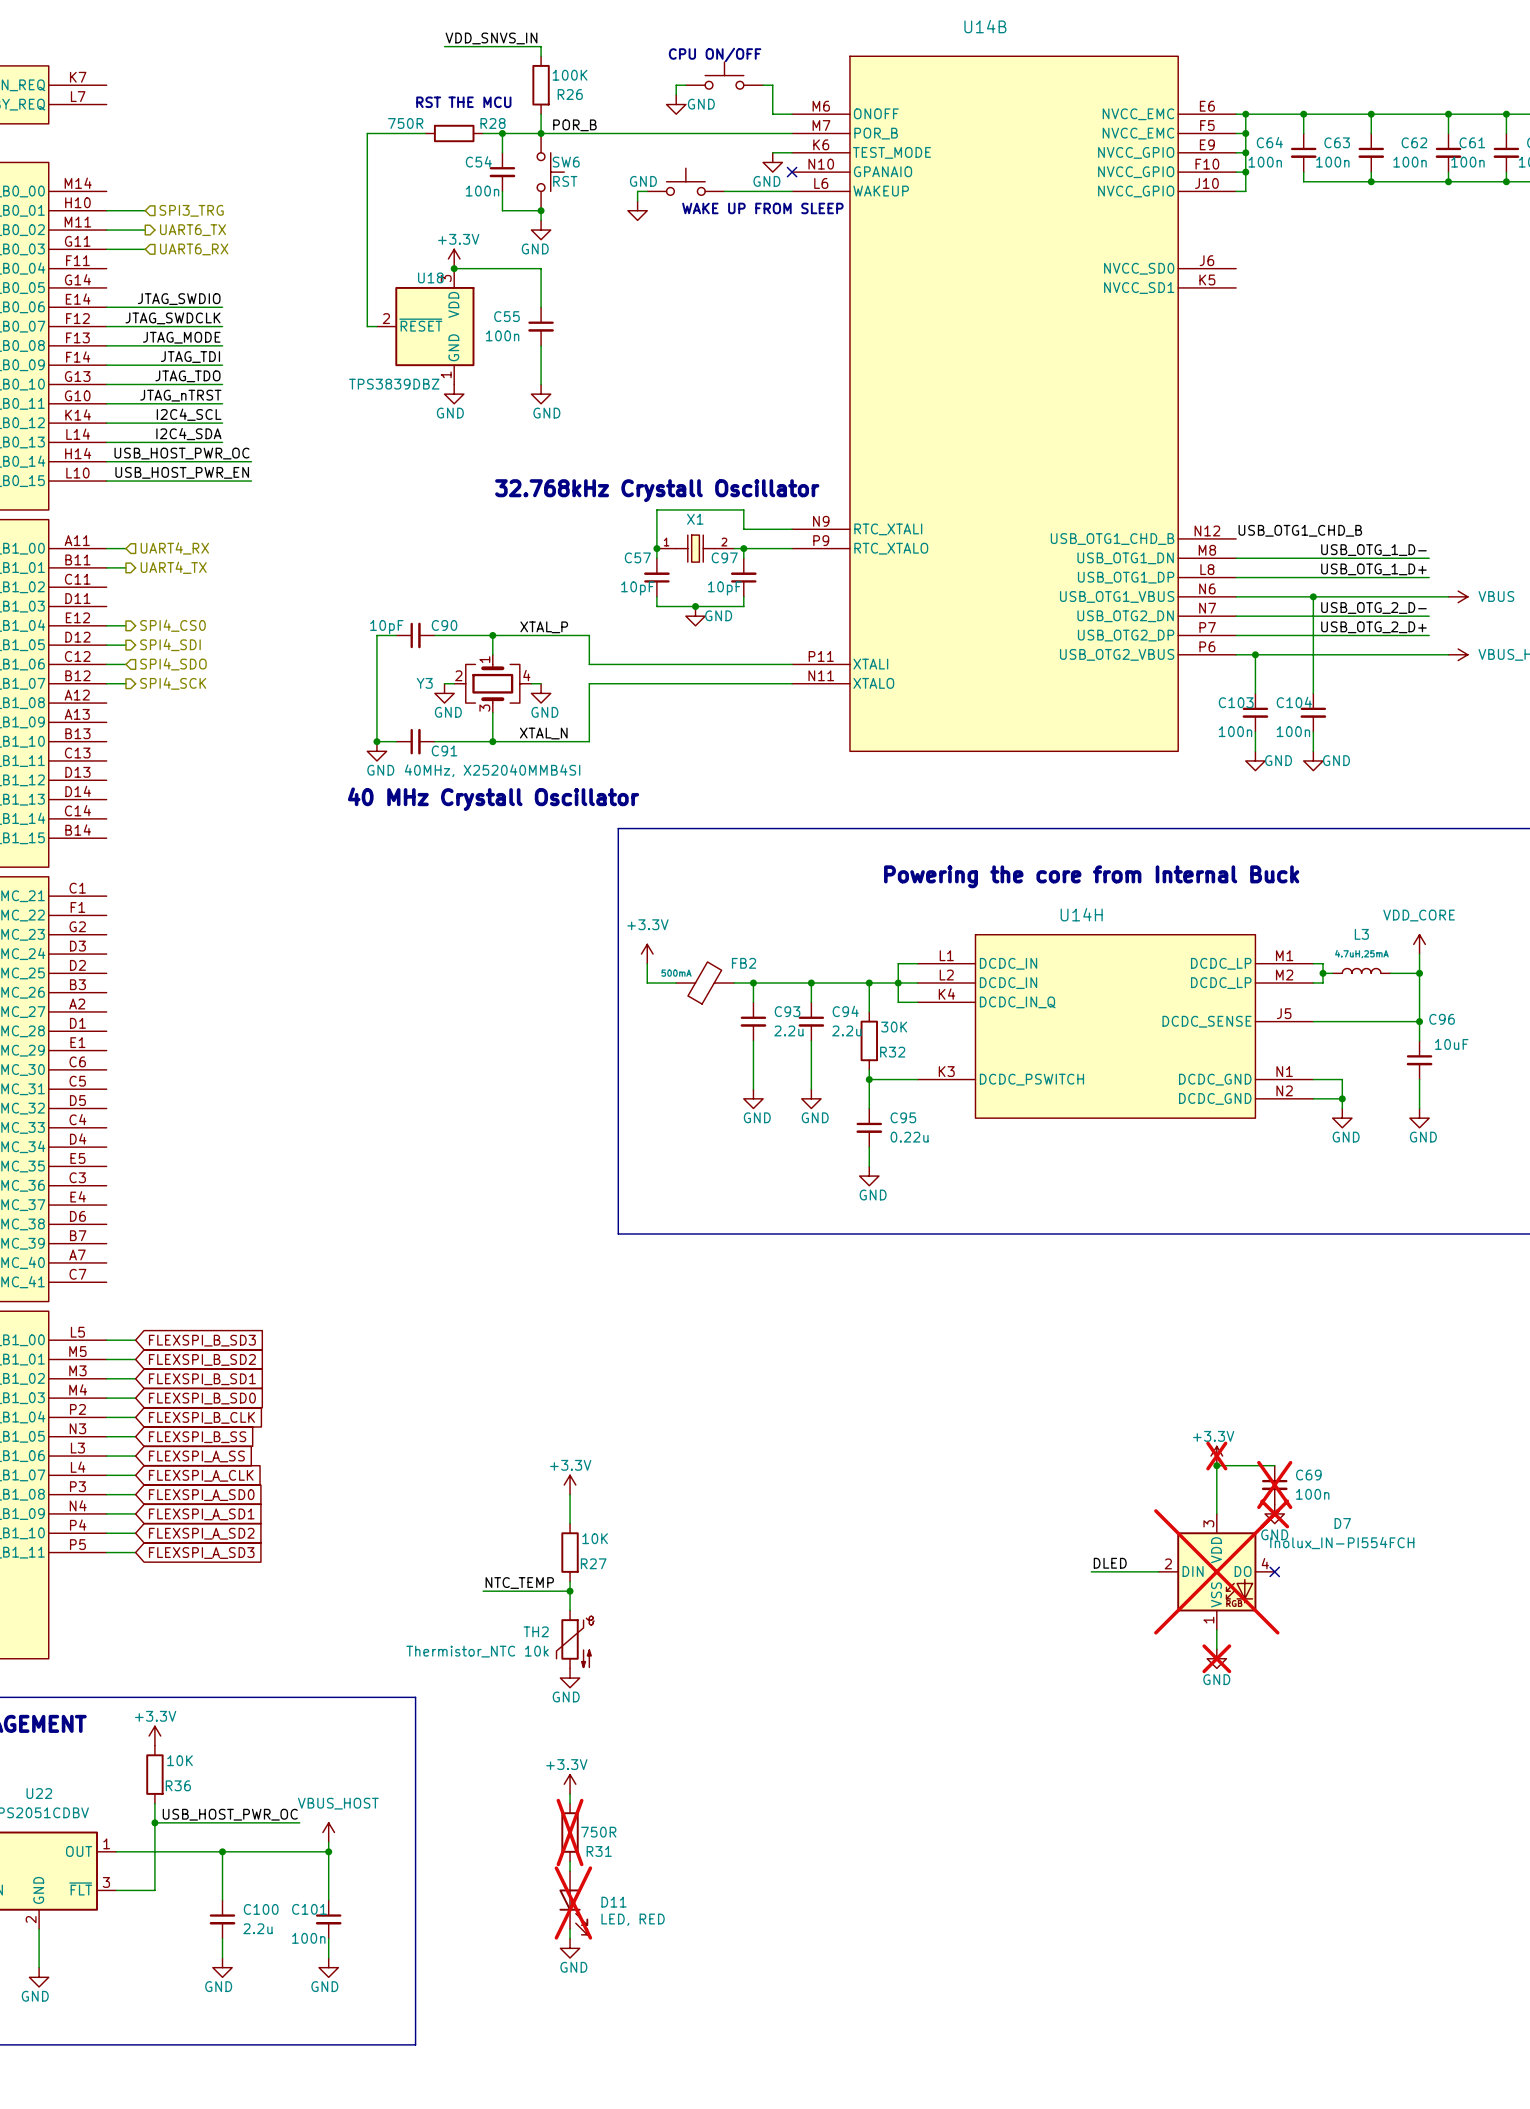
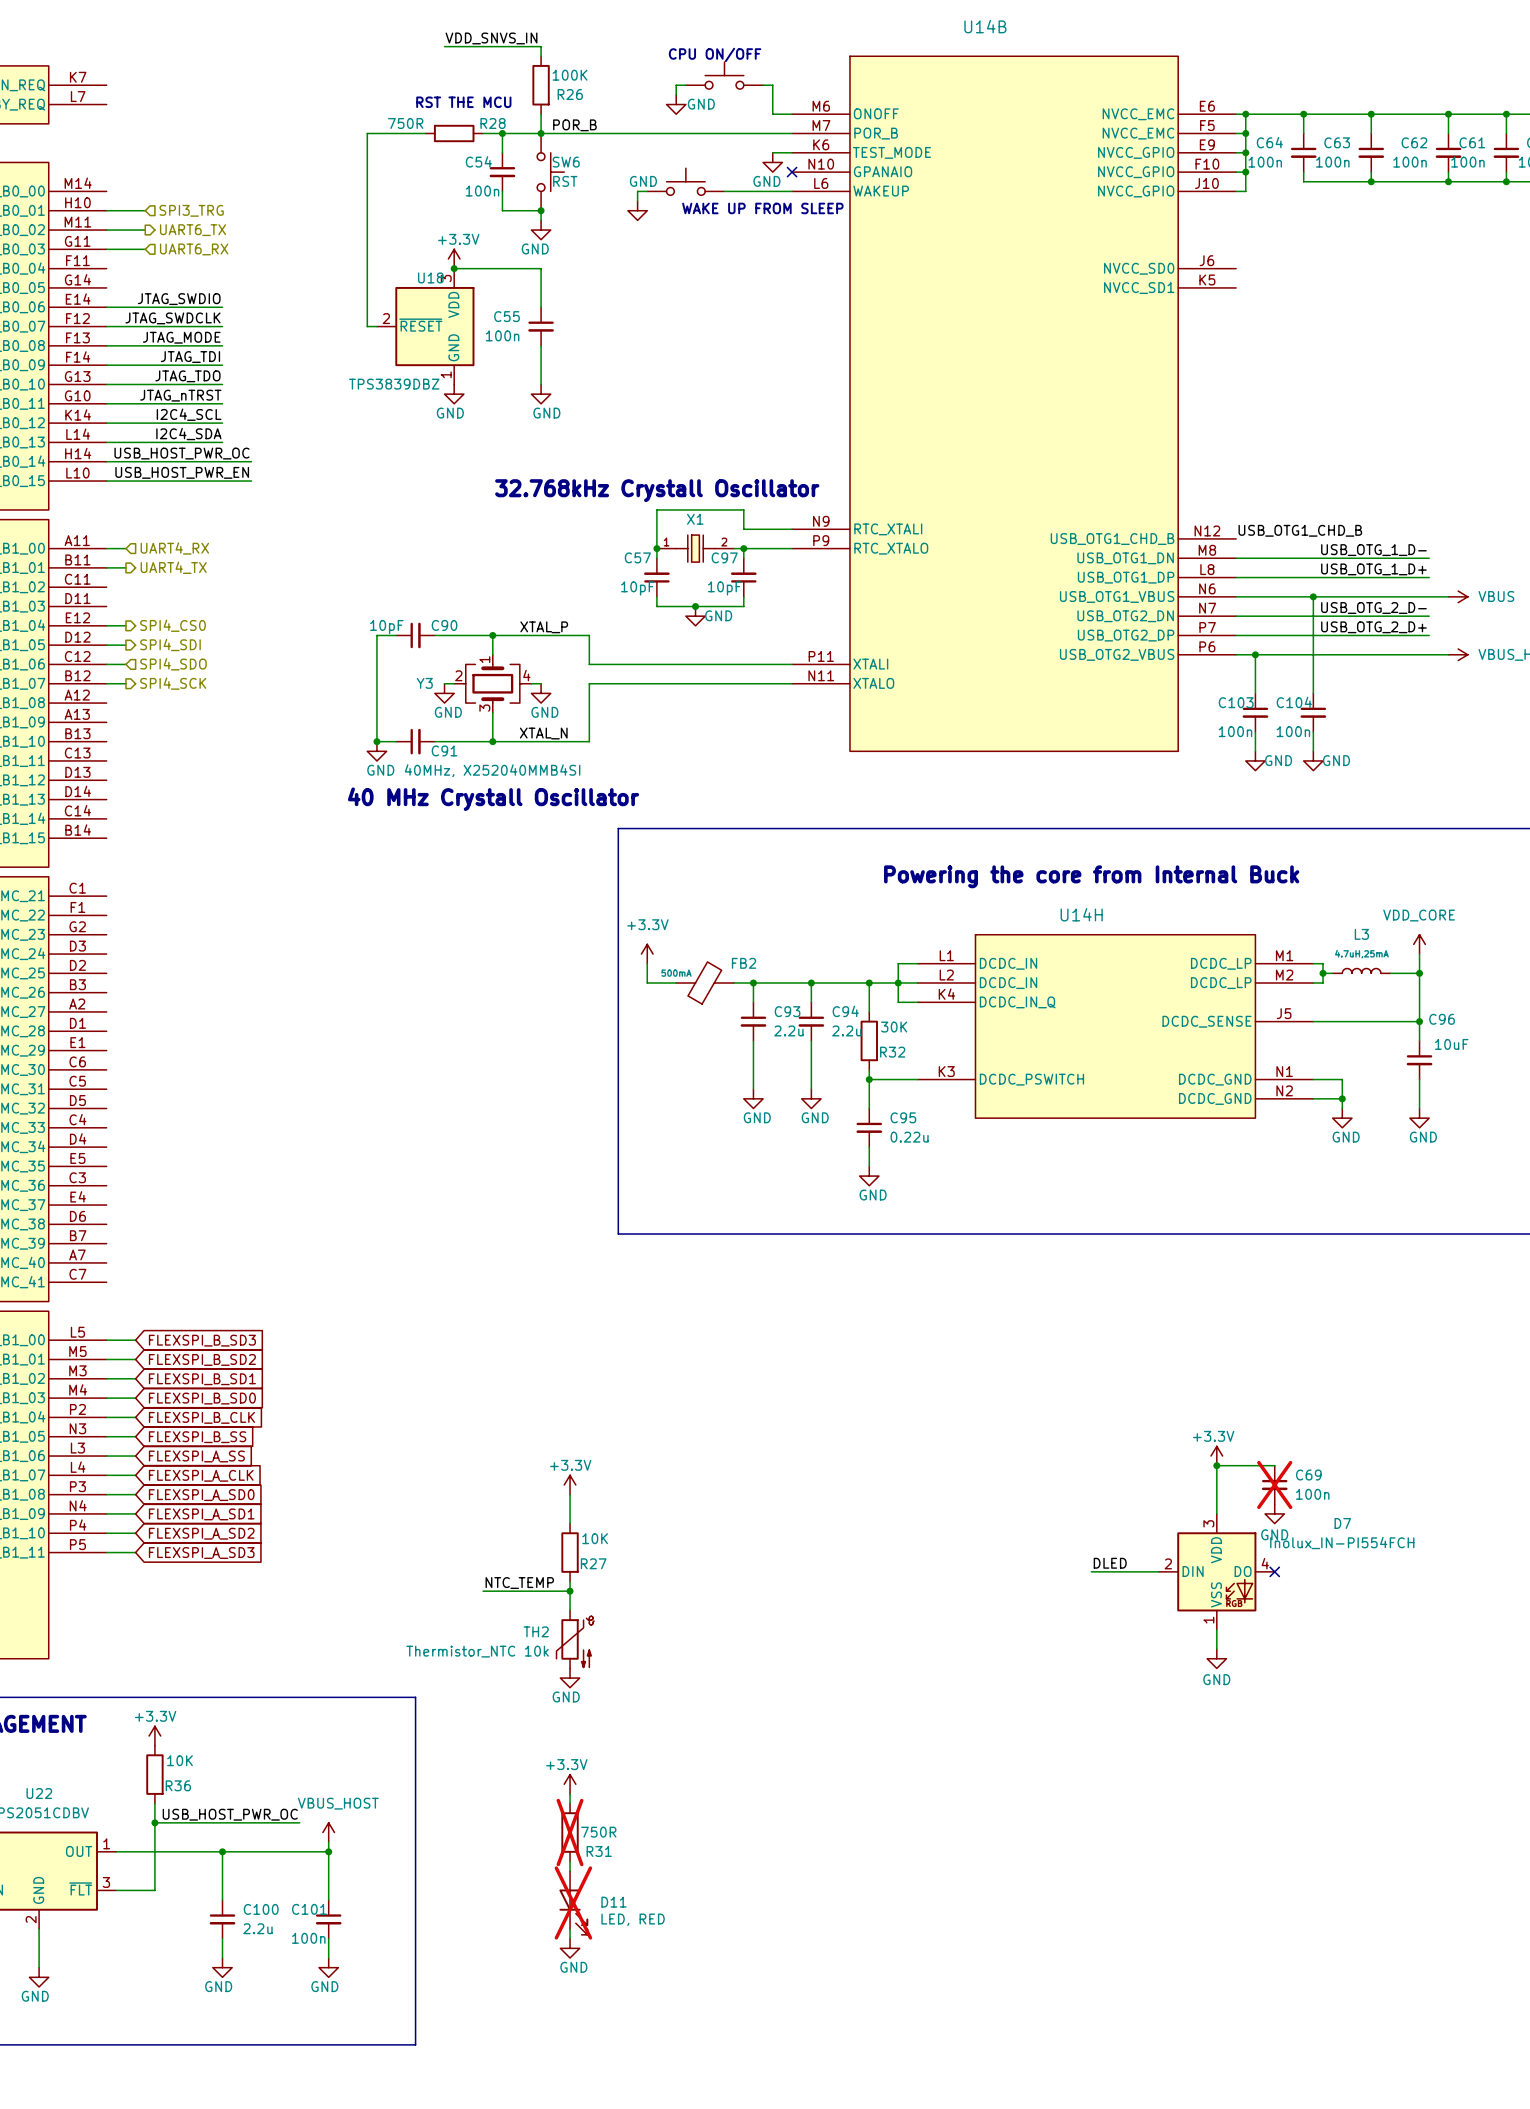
power symbol do-not-place cross: (1216, 1456) -> none
power symbol do-not-place cross: (1274, 1513) -> none
D7 do-not-place cross: (1216, 1571) -> none
power symbol do-not-place cross: (1216, 1658) -> none

